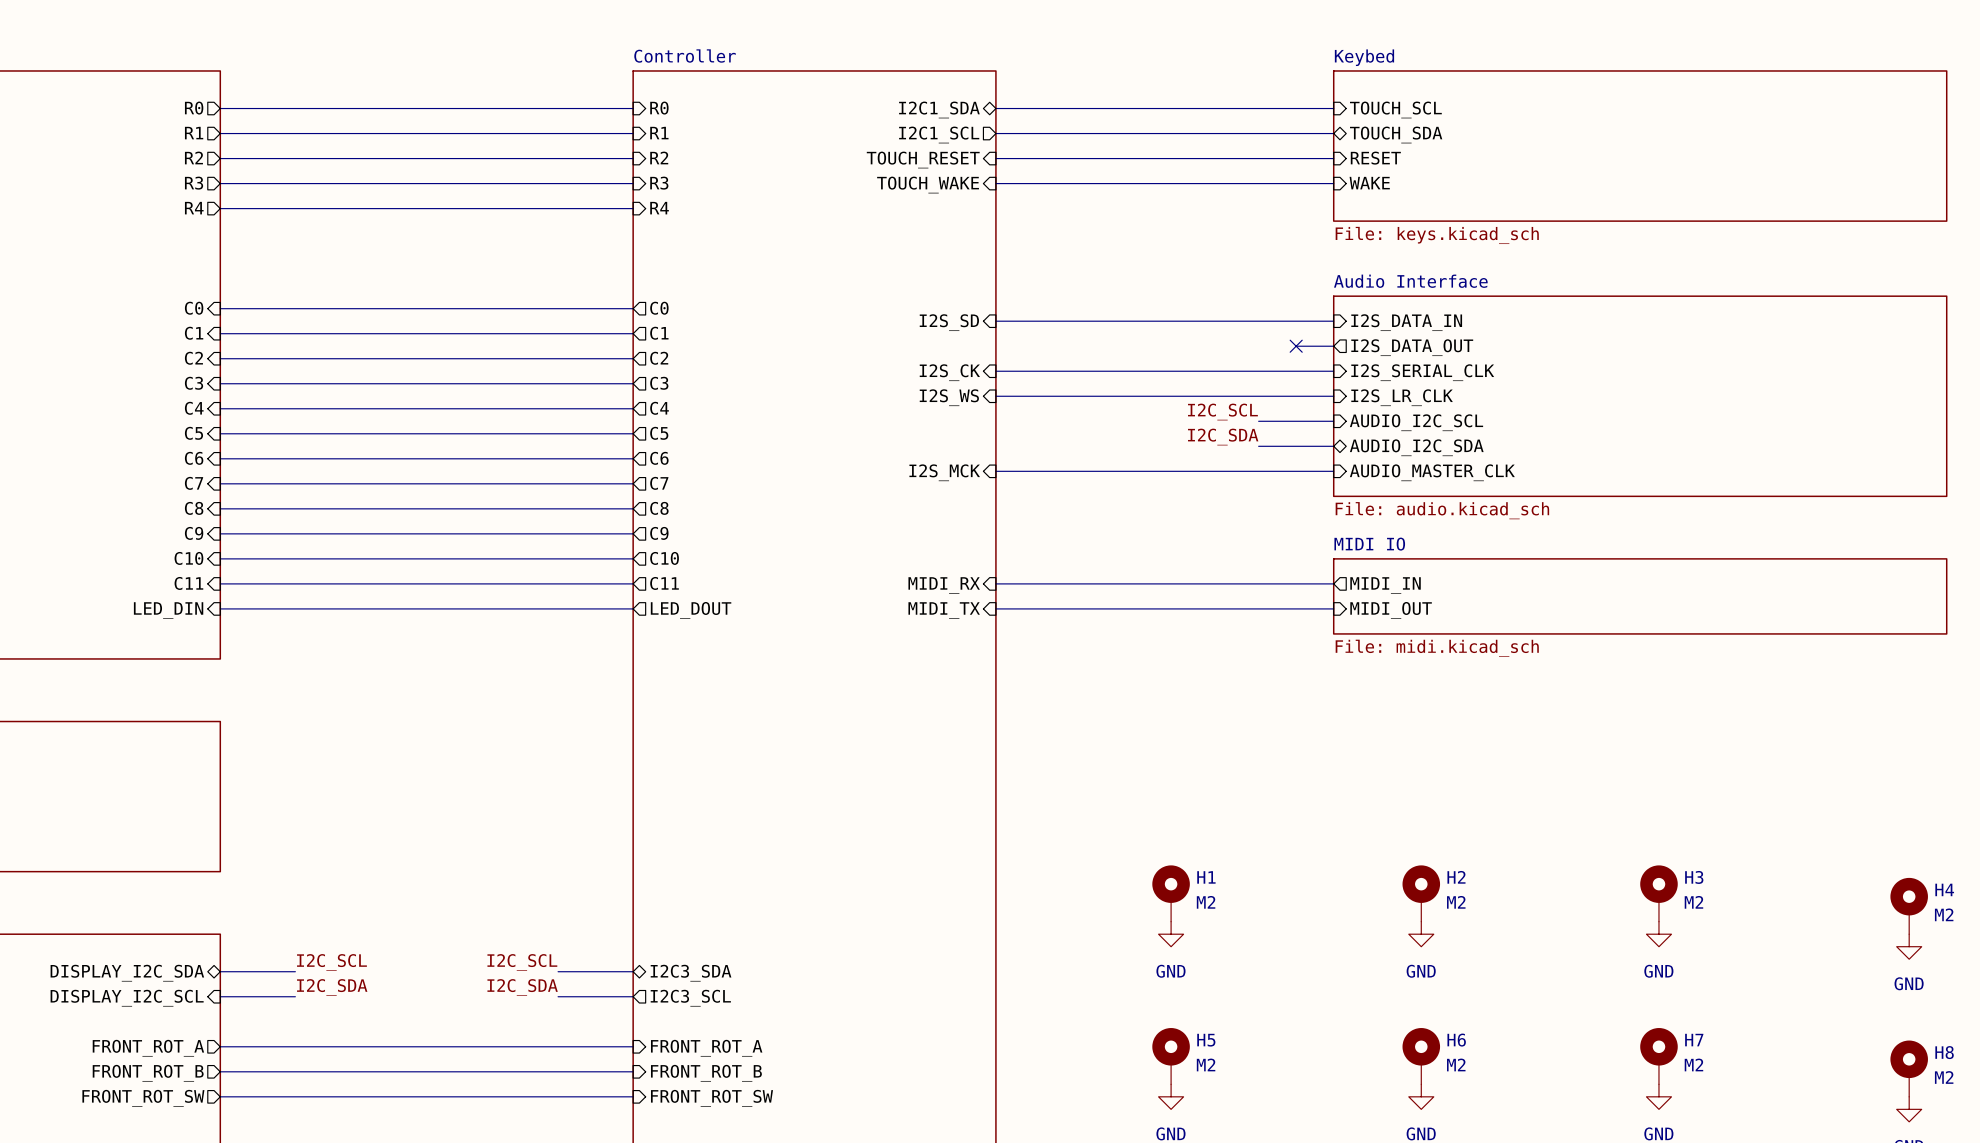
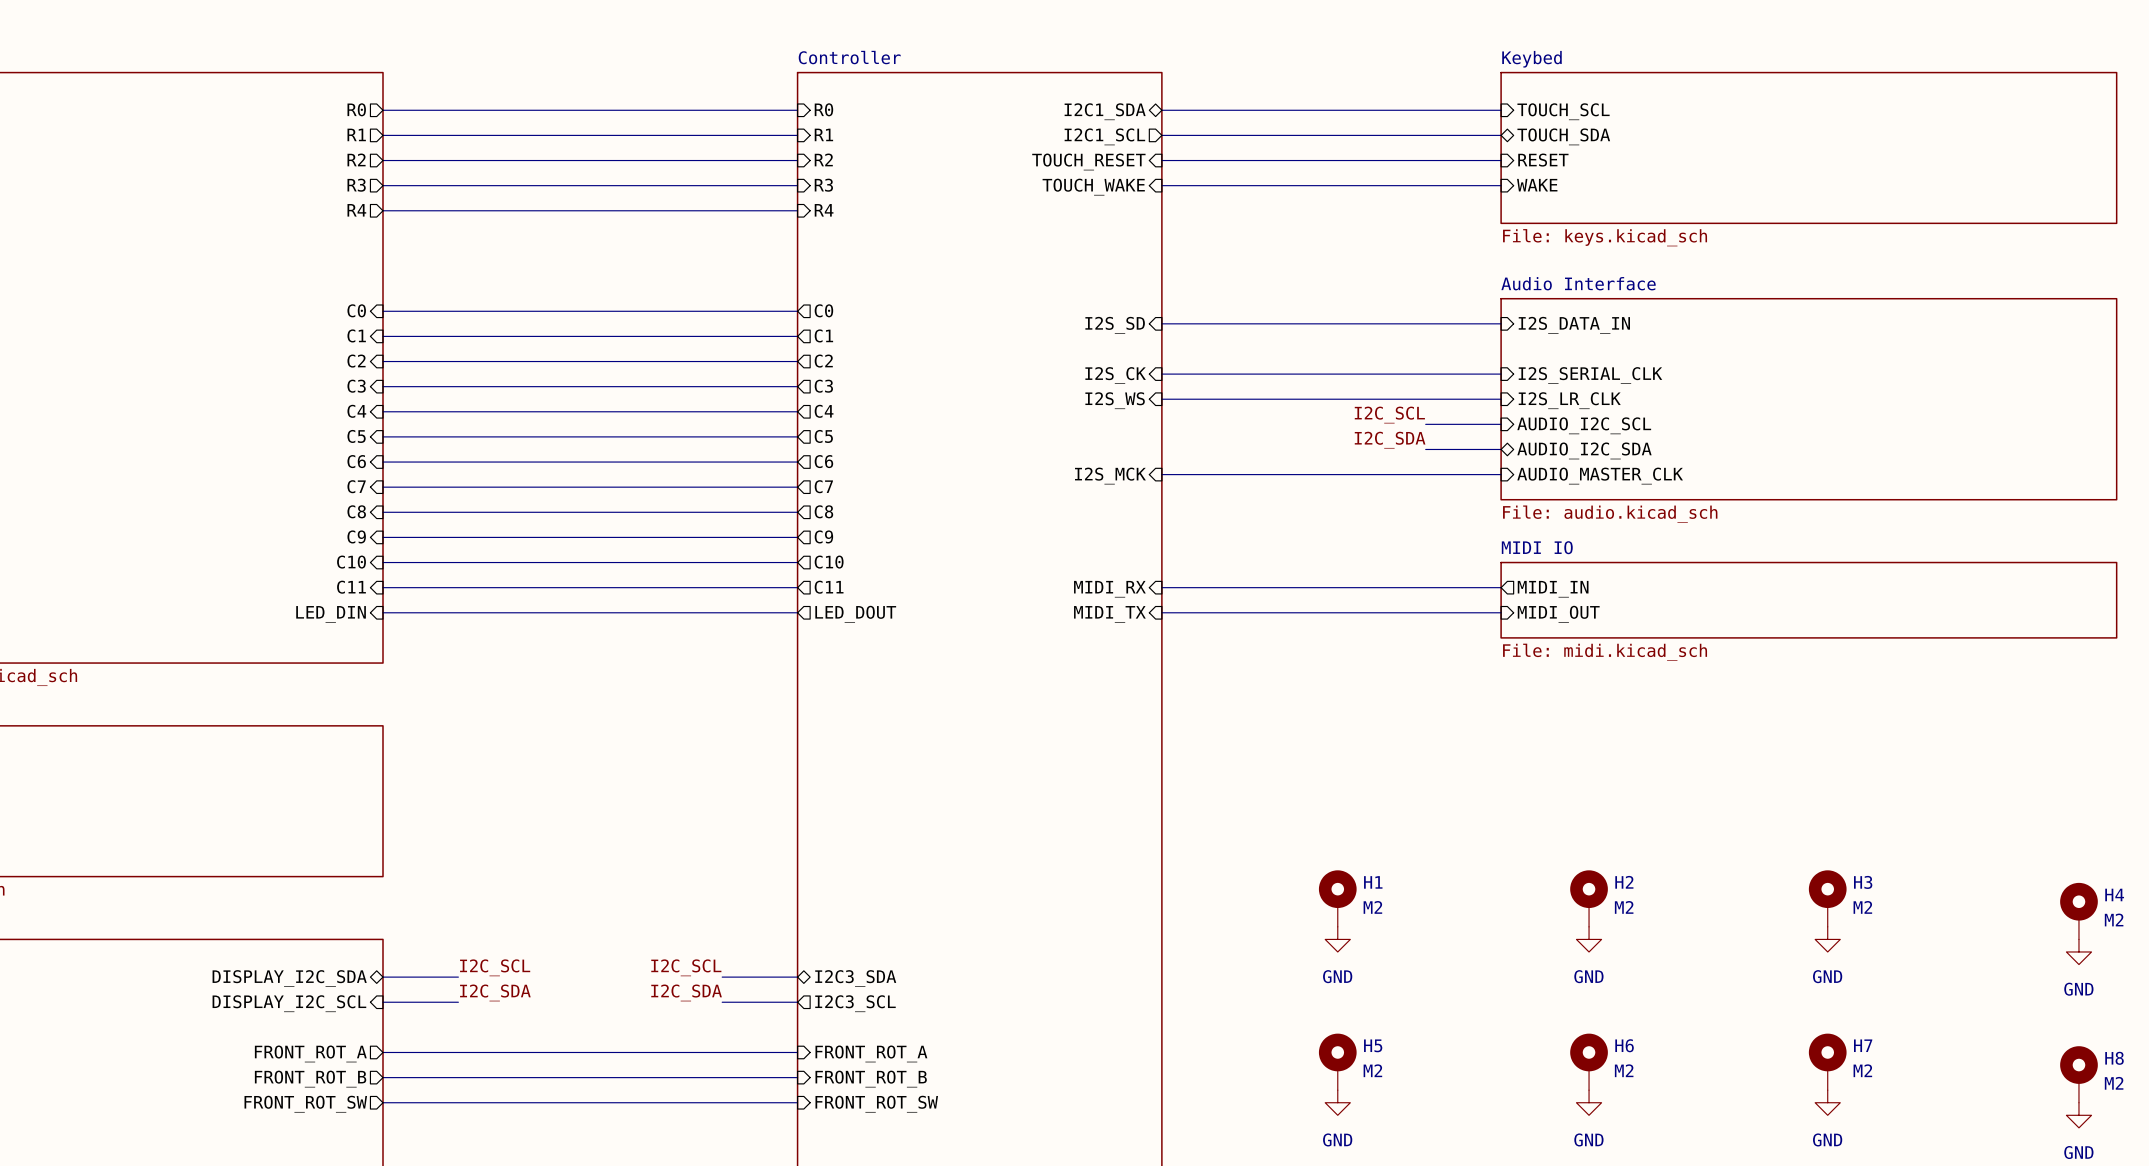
wire: (1296, 346) (1333, 346) -> none
no-connect mark: (1296, 346) -> none
sheet pin: I2S_DATA_OUT (1412, 347) -> none

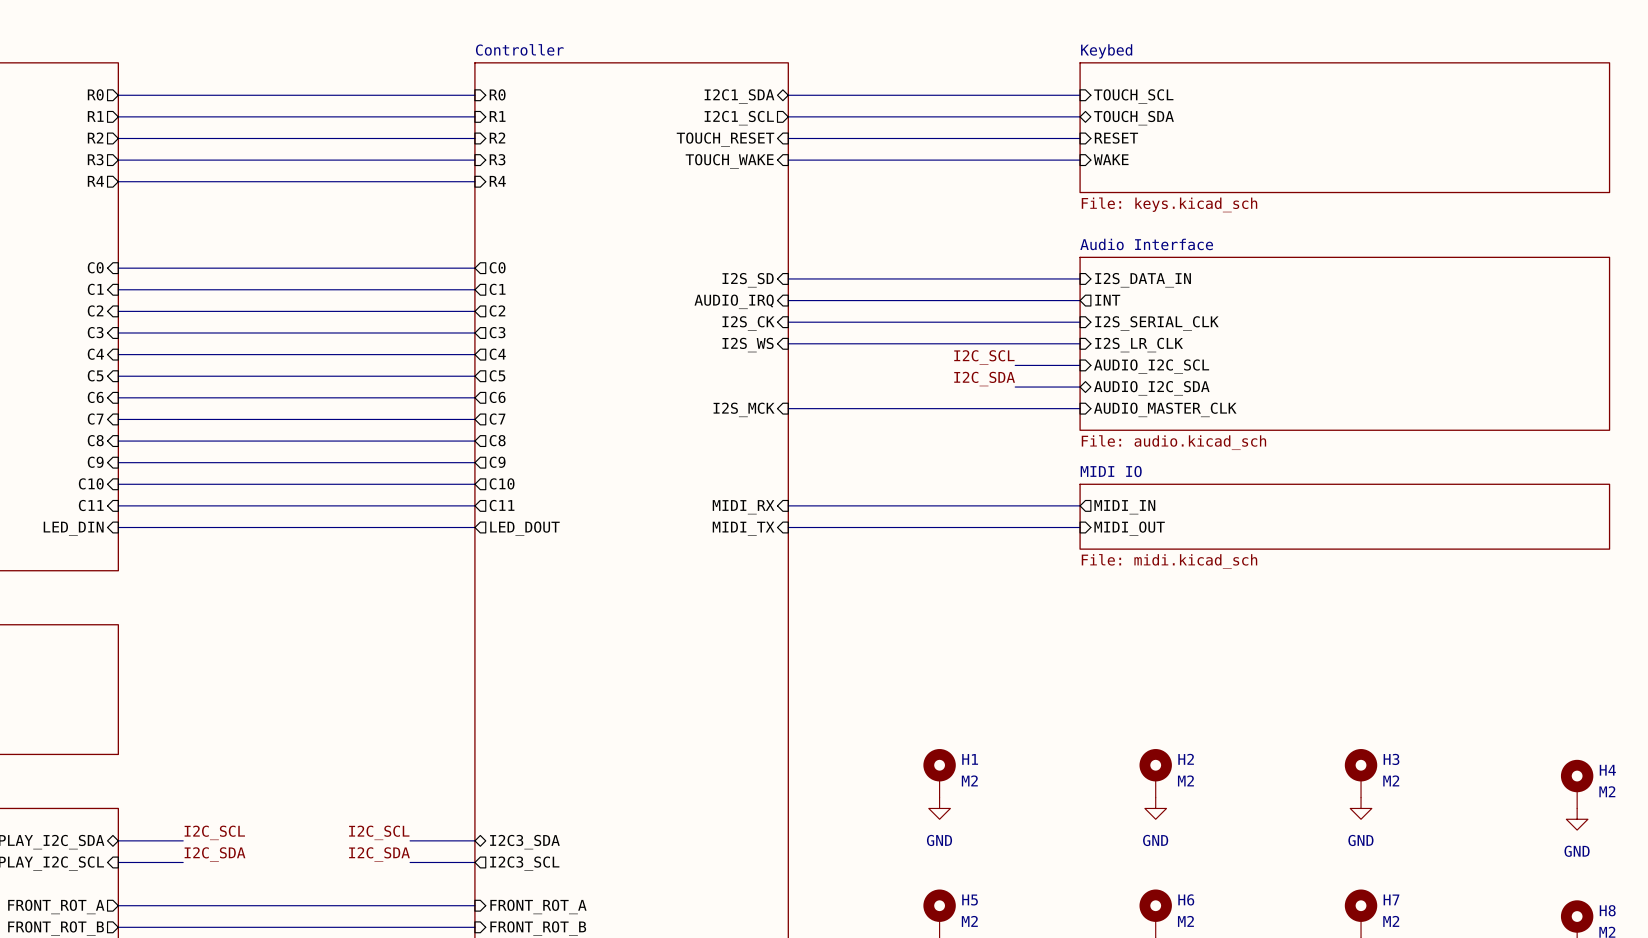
wire: none -> (788, 300) (1080, 300)
sheet pin: none -> INT (1107, 300)
sheet pin: none -> AUDIO_IRQ (734, 301)

